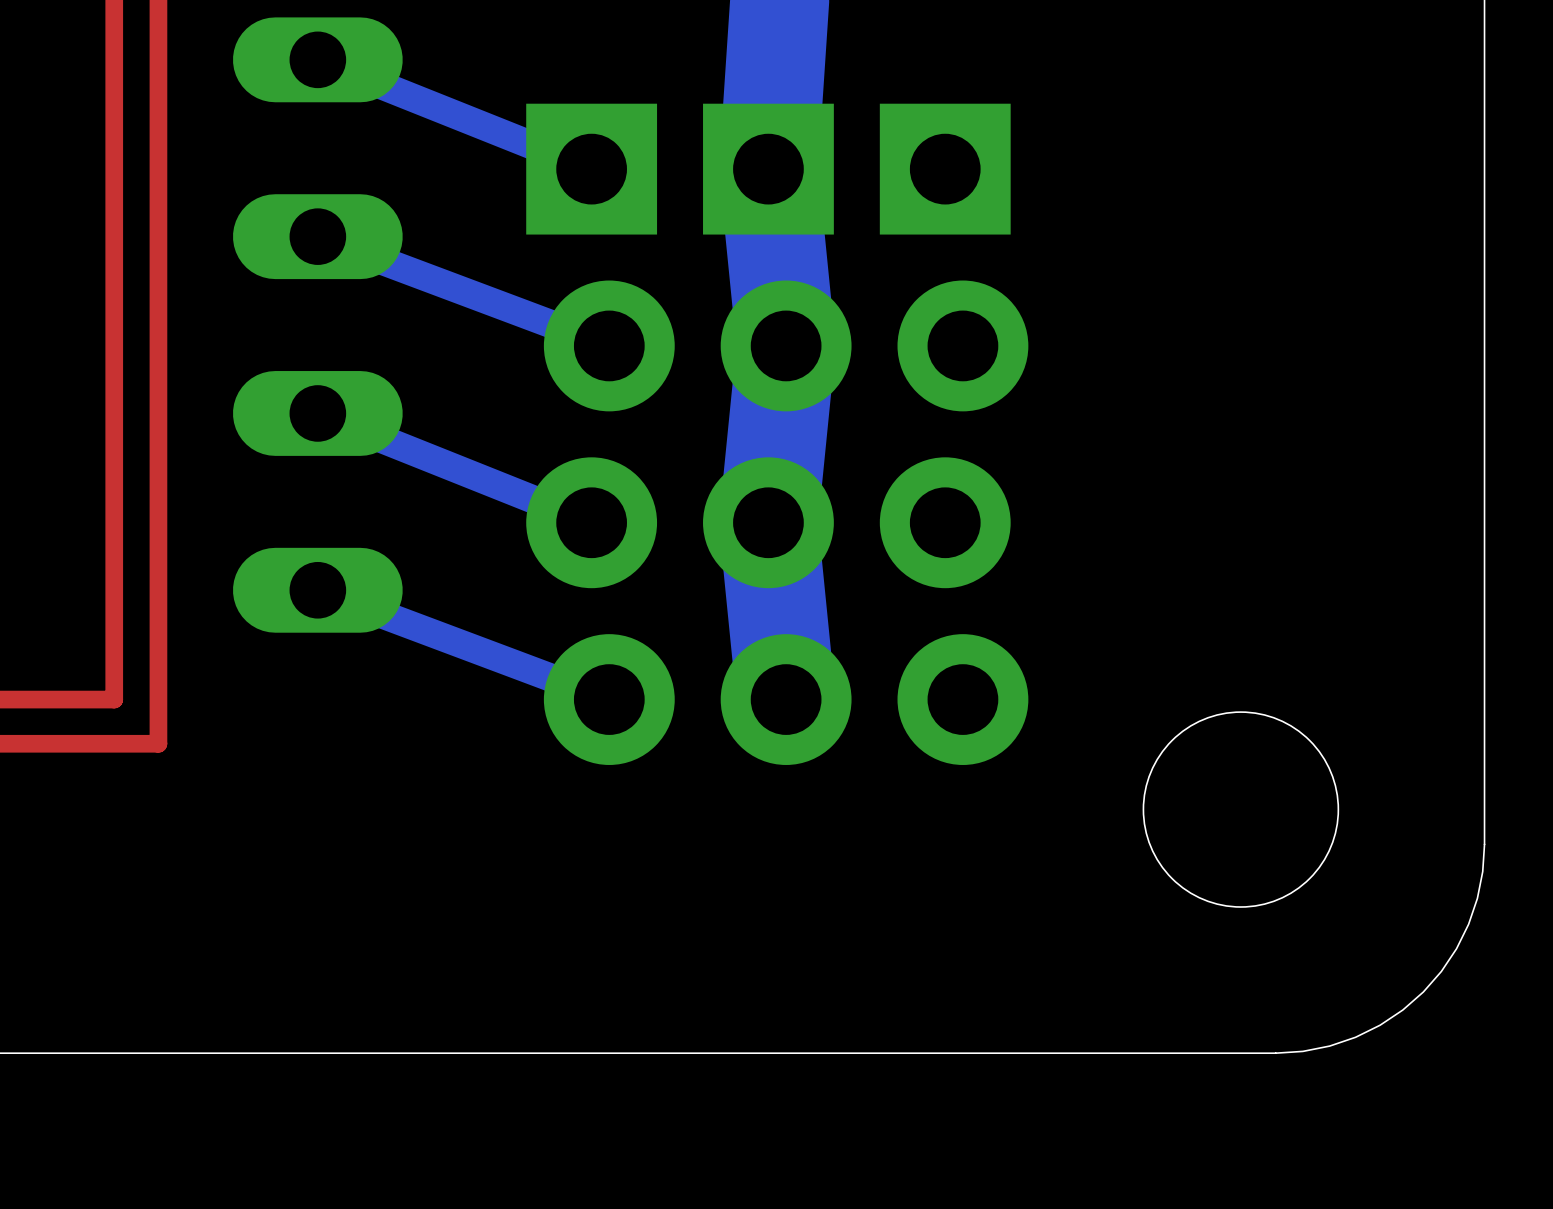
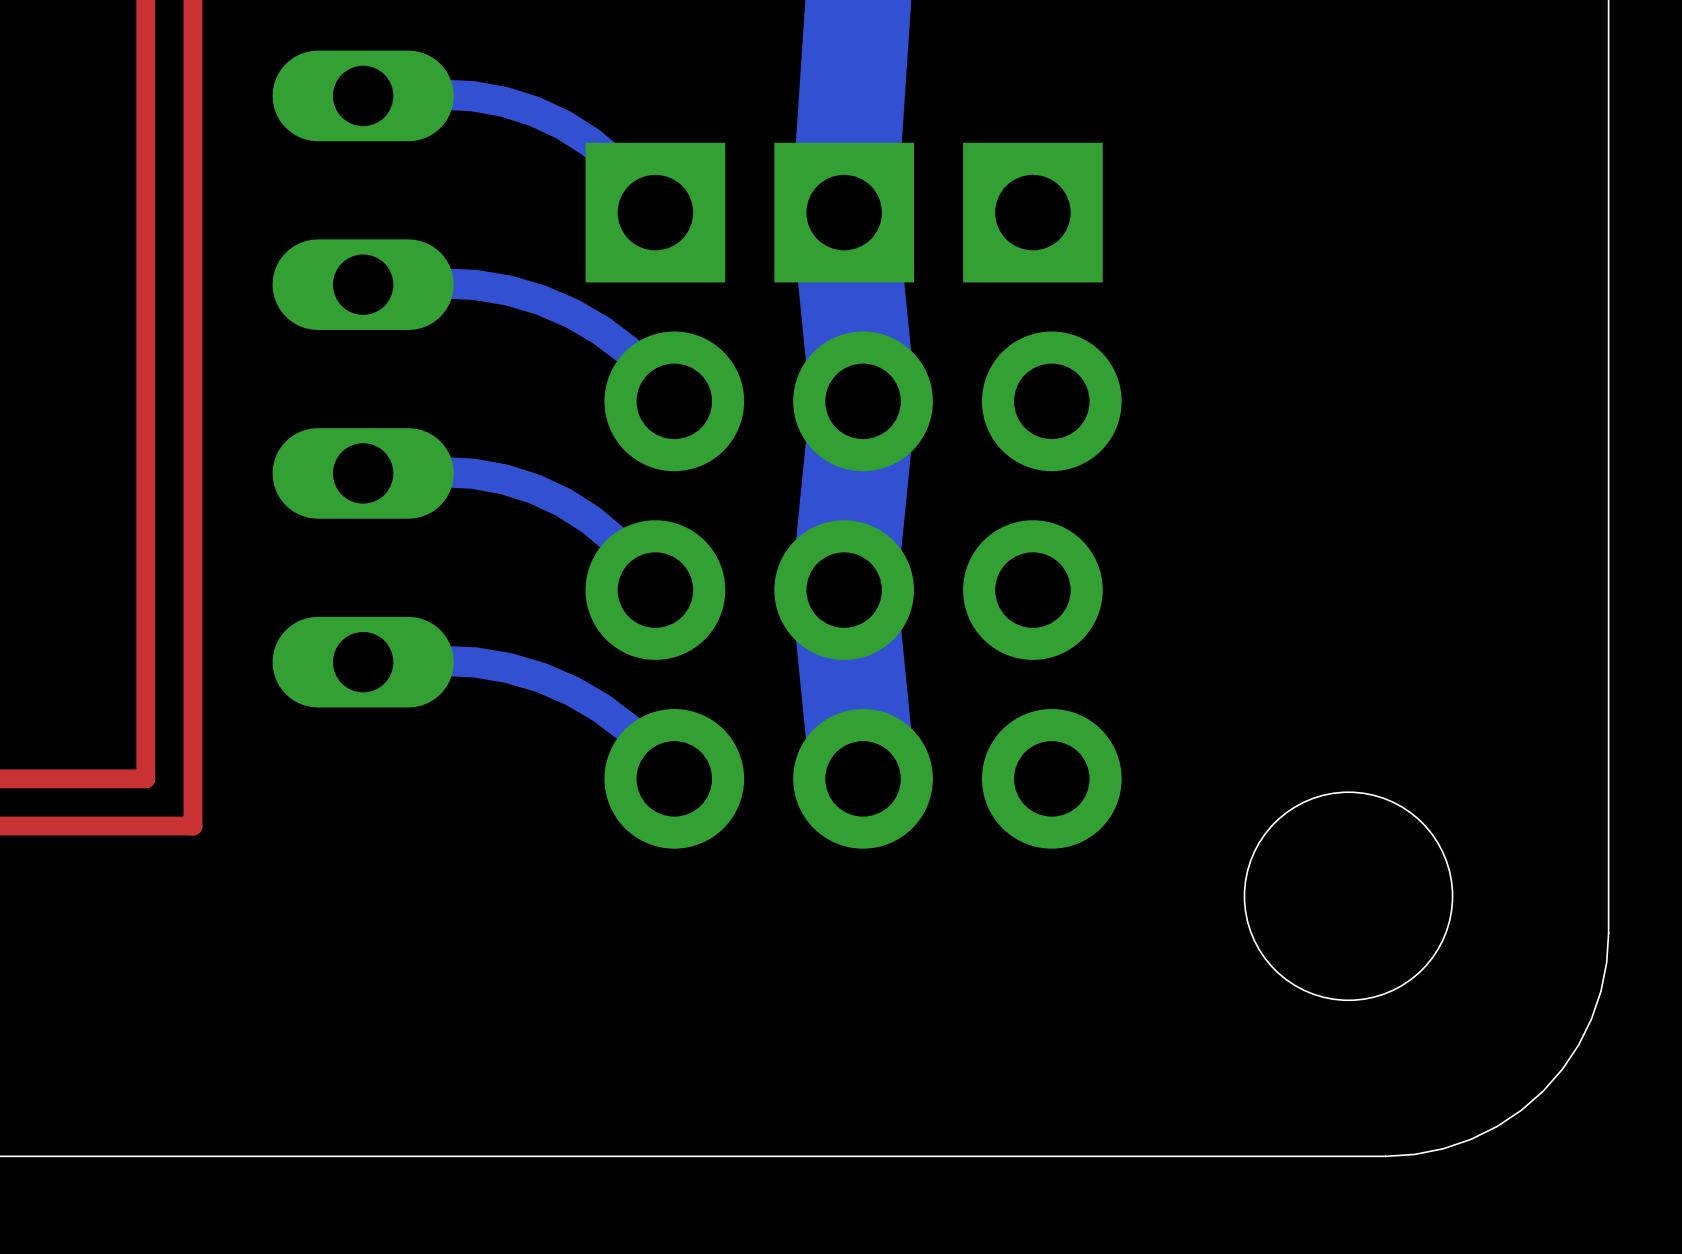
bottom track: (317, 59) (591, 169) -> (363, 95) (472, 96) (504, 101) (534, 111) (563, 125) (590, 142) (615, 162) (636, 186) (655, 212)
bottom track: (317, 236) (609, 345) -> (363, 284) (474, 284) (508, 290) (540, 300) (572, 313) (601, 330) (628, 351) (652, 374) (674, 401)
bottom track: (317, 413) (591, 522) -> (363, 473) (472, 473) (504, 479) (534, 489) (563, 502) (590, 519) (615, 540) (636, 563) (655, 590)
bottom track: (317, 590) (609, 699) -> (363, 662) (474, 662) (508, 667) (540, 677) (572, 691) (601, 708) (628, 728) (652, 752) (674, 778)

